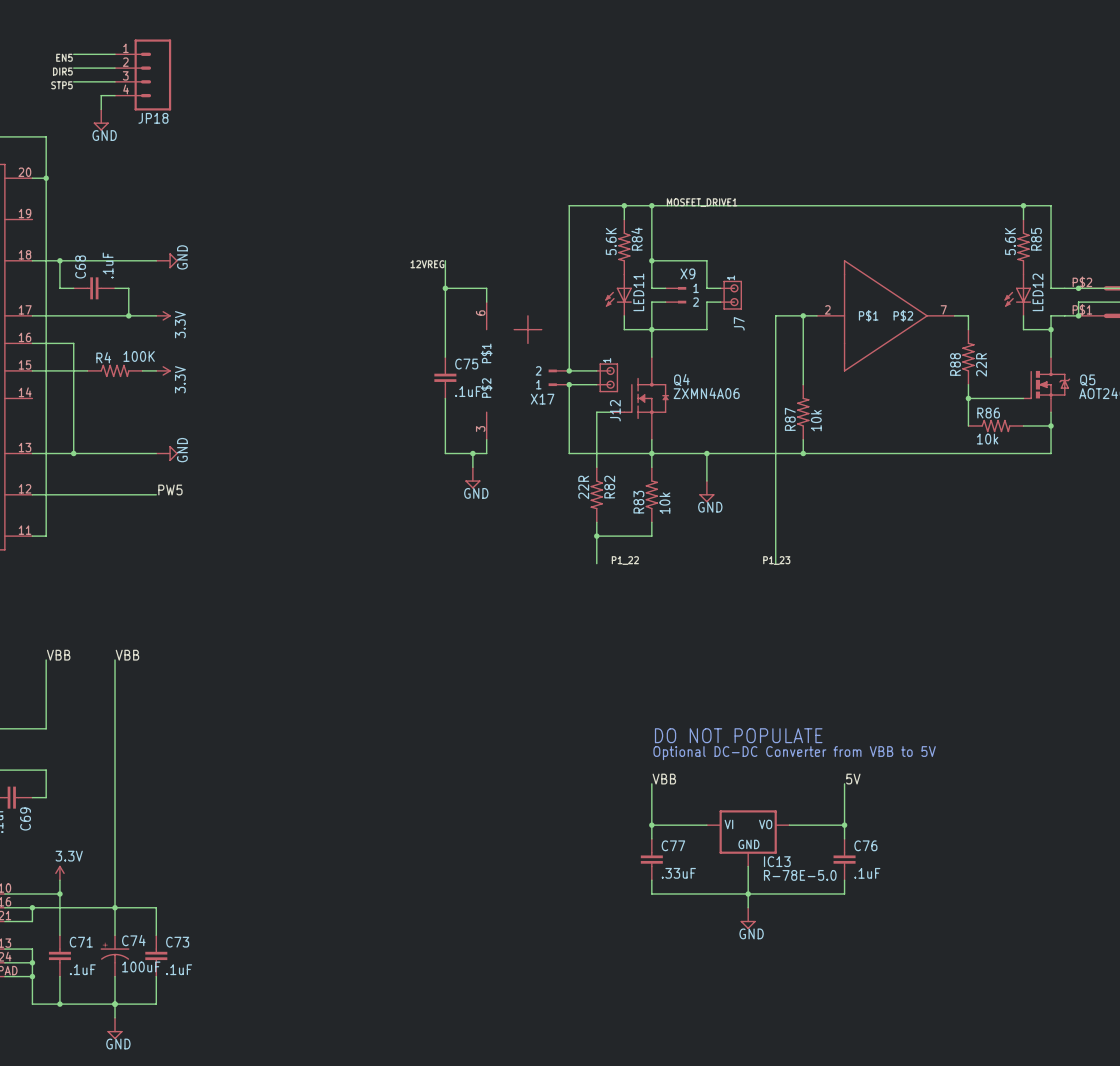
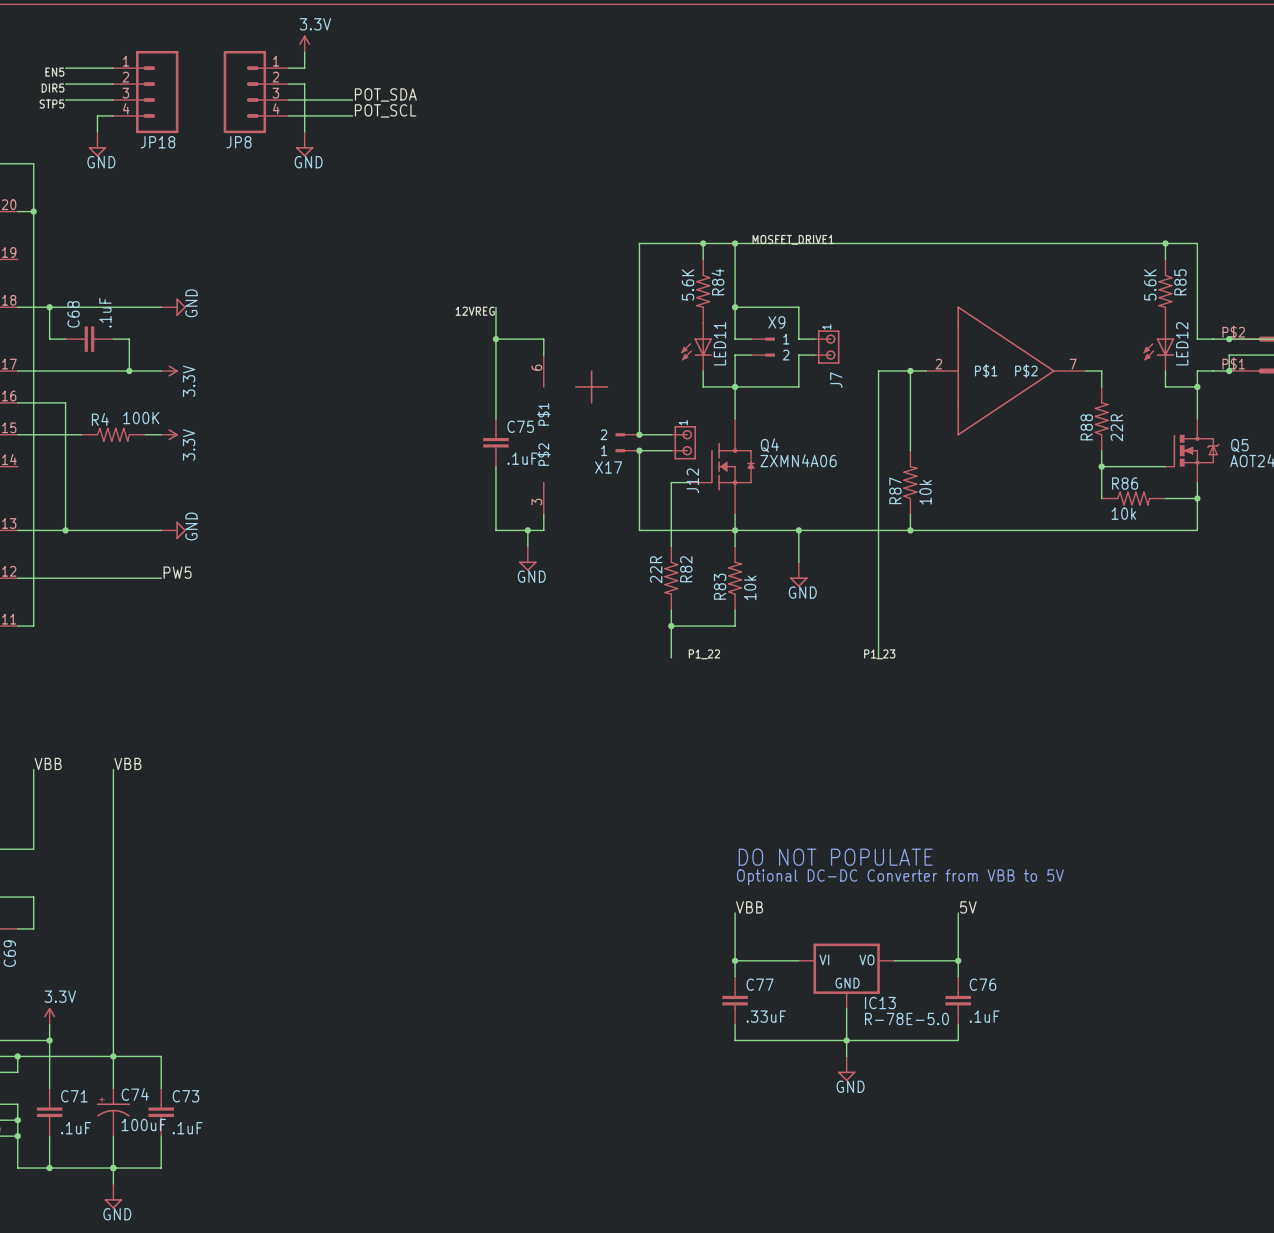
power symbol: none -> 3.3V (304, 43)
wire: none -> (304, 52) (304, 68) (288, 68)
wire: none -> (288, 84) (304, 84) (304, 131)
JP8: none -> (256, 92)
label: none -> POT_SDA (385, 94)
wire: none -> (288, 100) (352, 100)
label: none -> POT_SCL (385, 110)
wire: none -> (288, 115) (352, 115)
power symbol: none -> GND (304, 144)

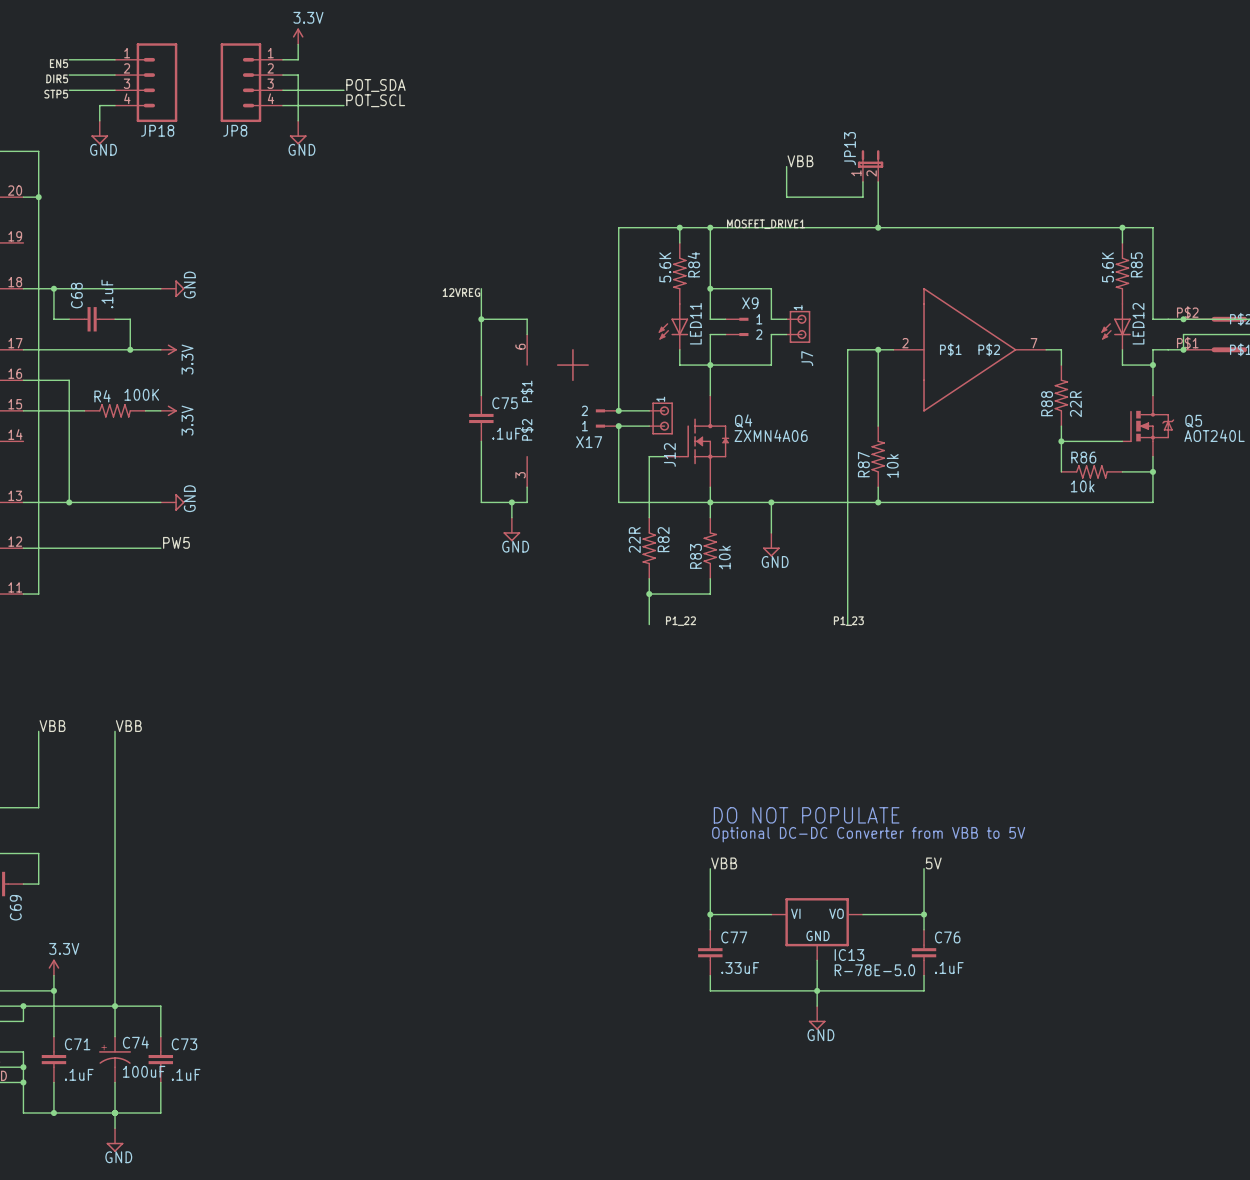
label: none -> VBB (800, 161)
wire: none -> (786, 166) (786, 197) (862, 197) (862, 181)
JP13: none -> (870, 166)
wire: none -> (878, 181) (878, 227)
junction: none -> (878, 227)

